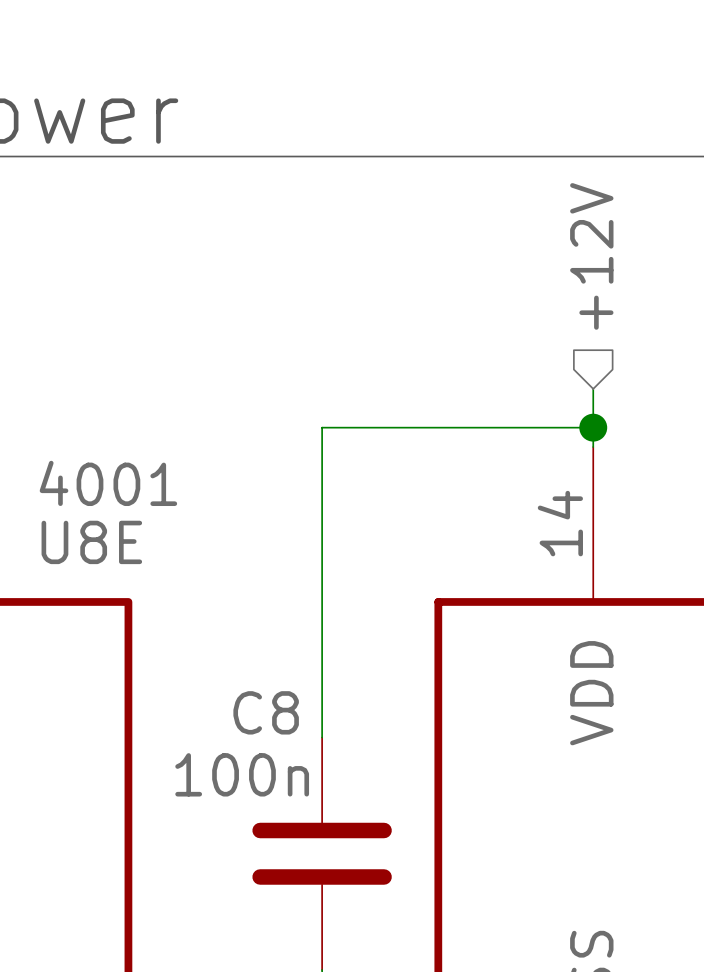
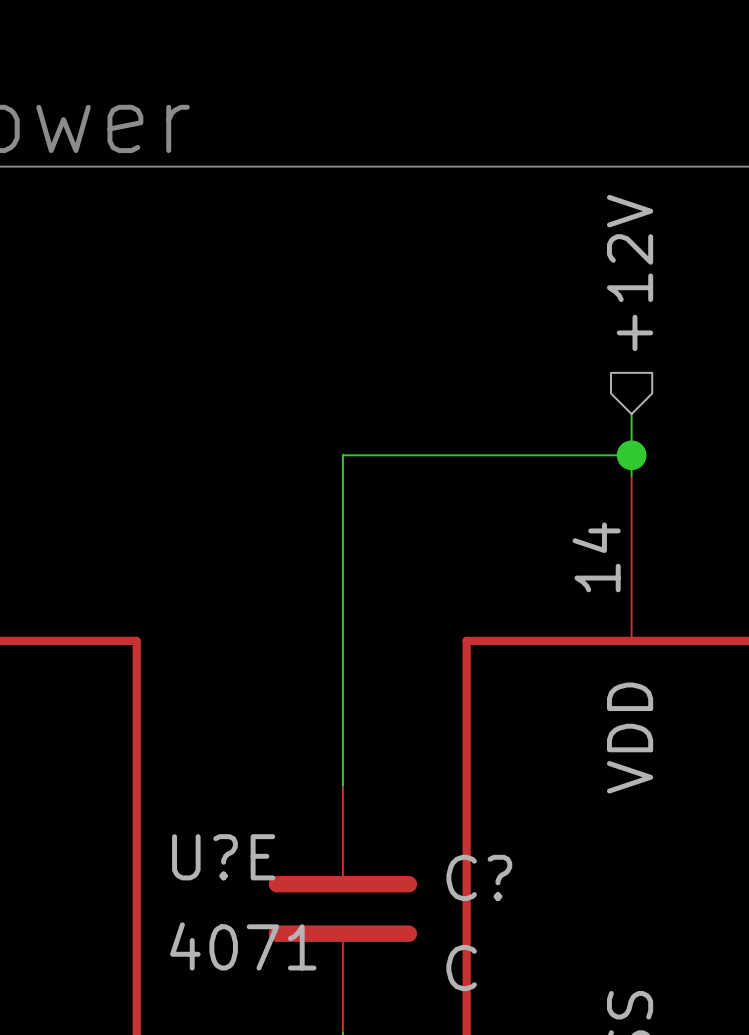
U8E value: 4001 (108, 483) -> 4071 (243, 946)
U8E name: U8E (91, 542) -> U?E (223, 857)
C8 name: C8 (266, 712) -> C? (479, 877)
C8 value: 100n (242, 774) -> C (461, 968)

